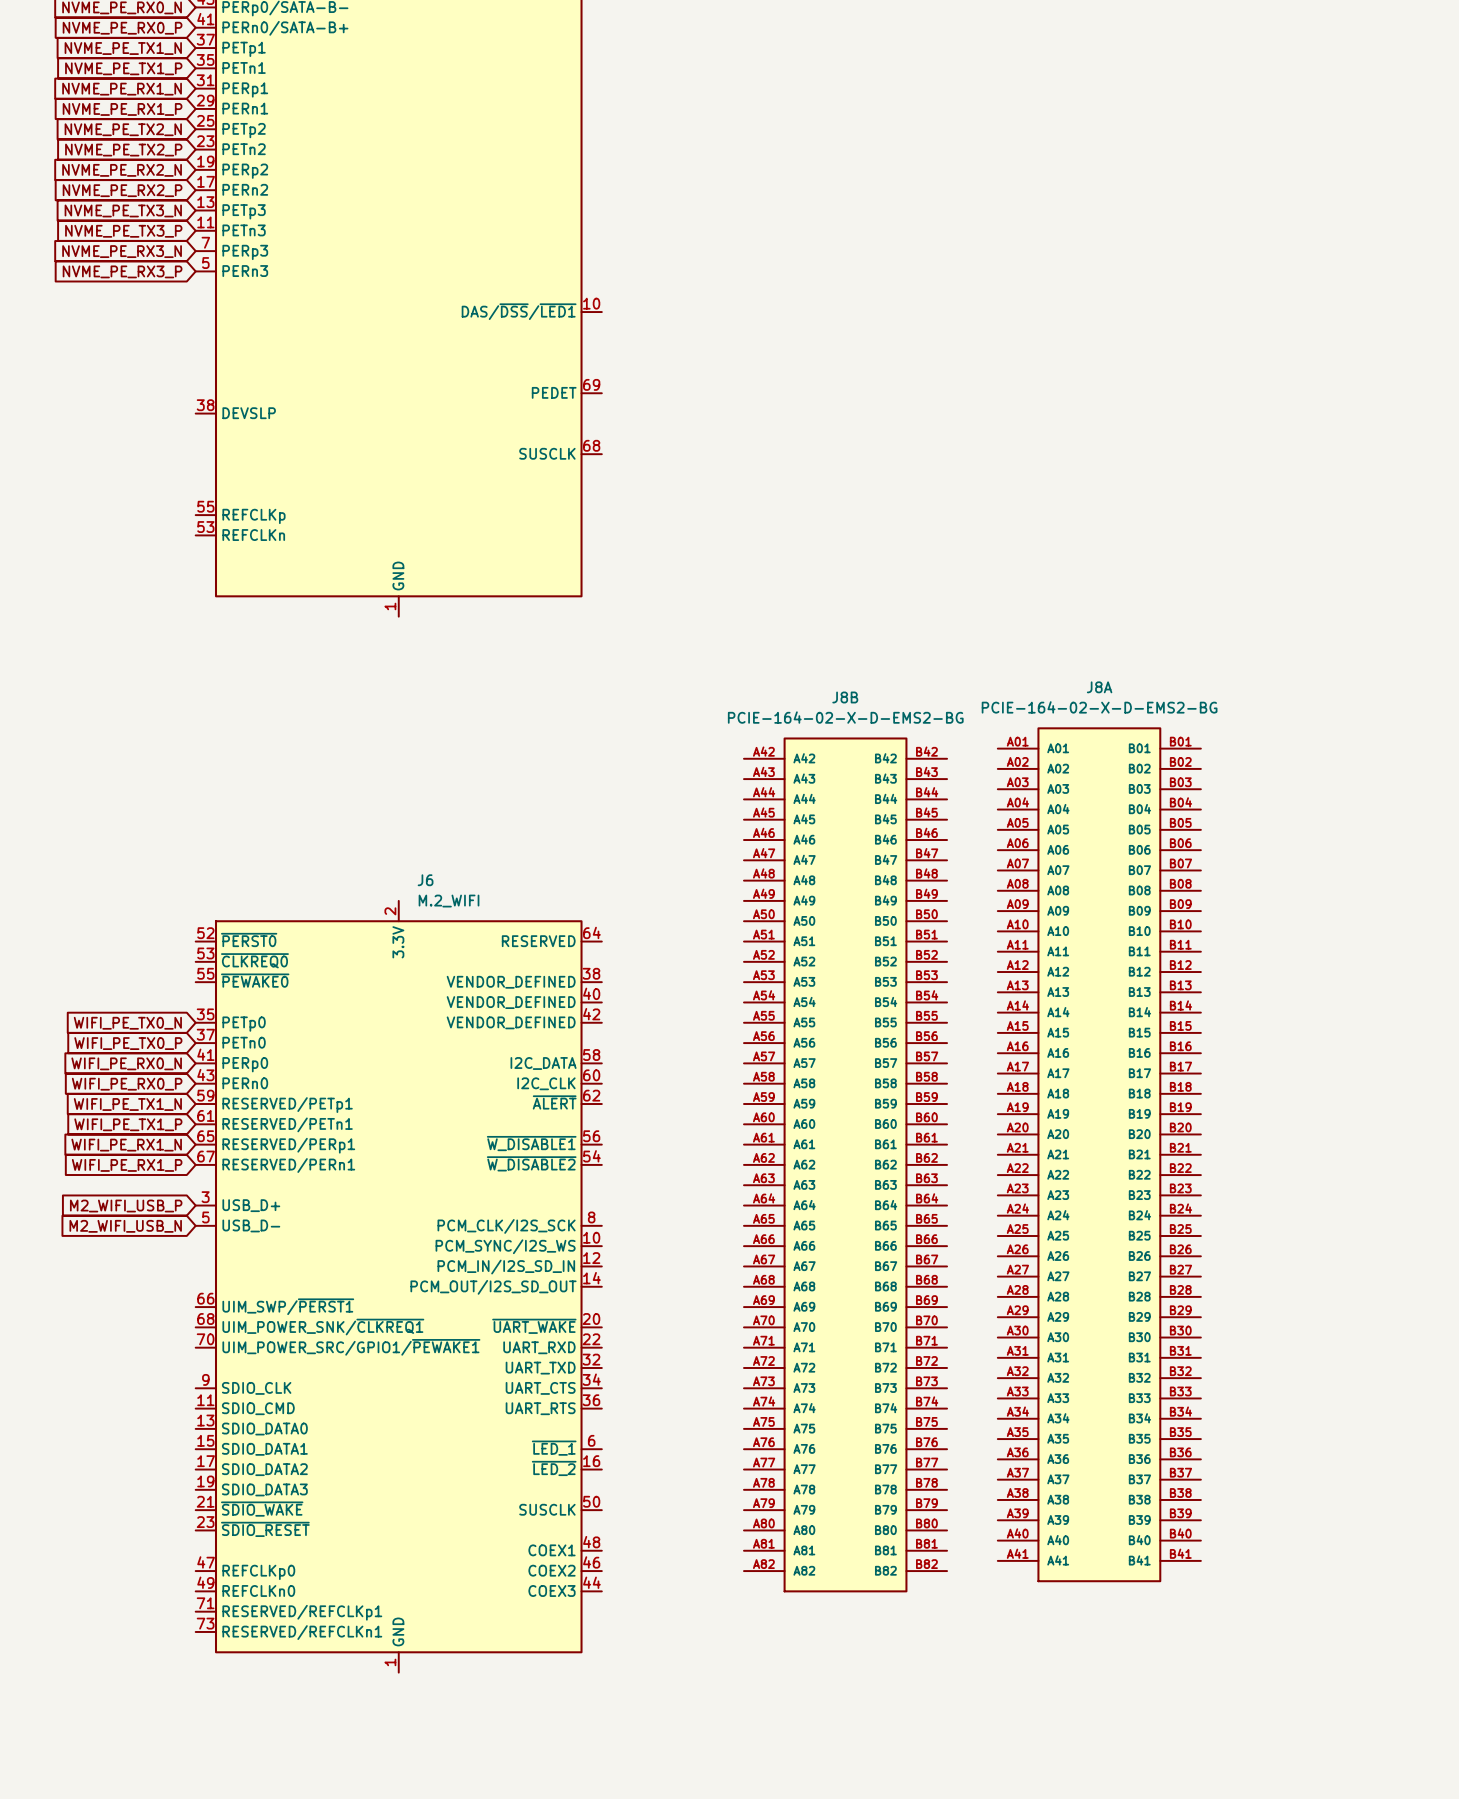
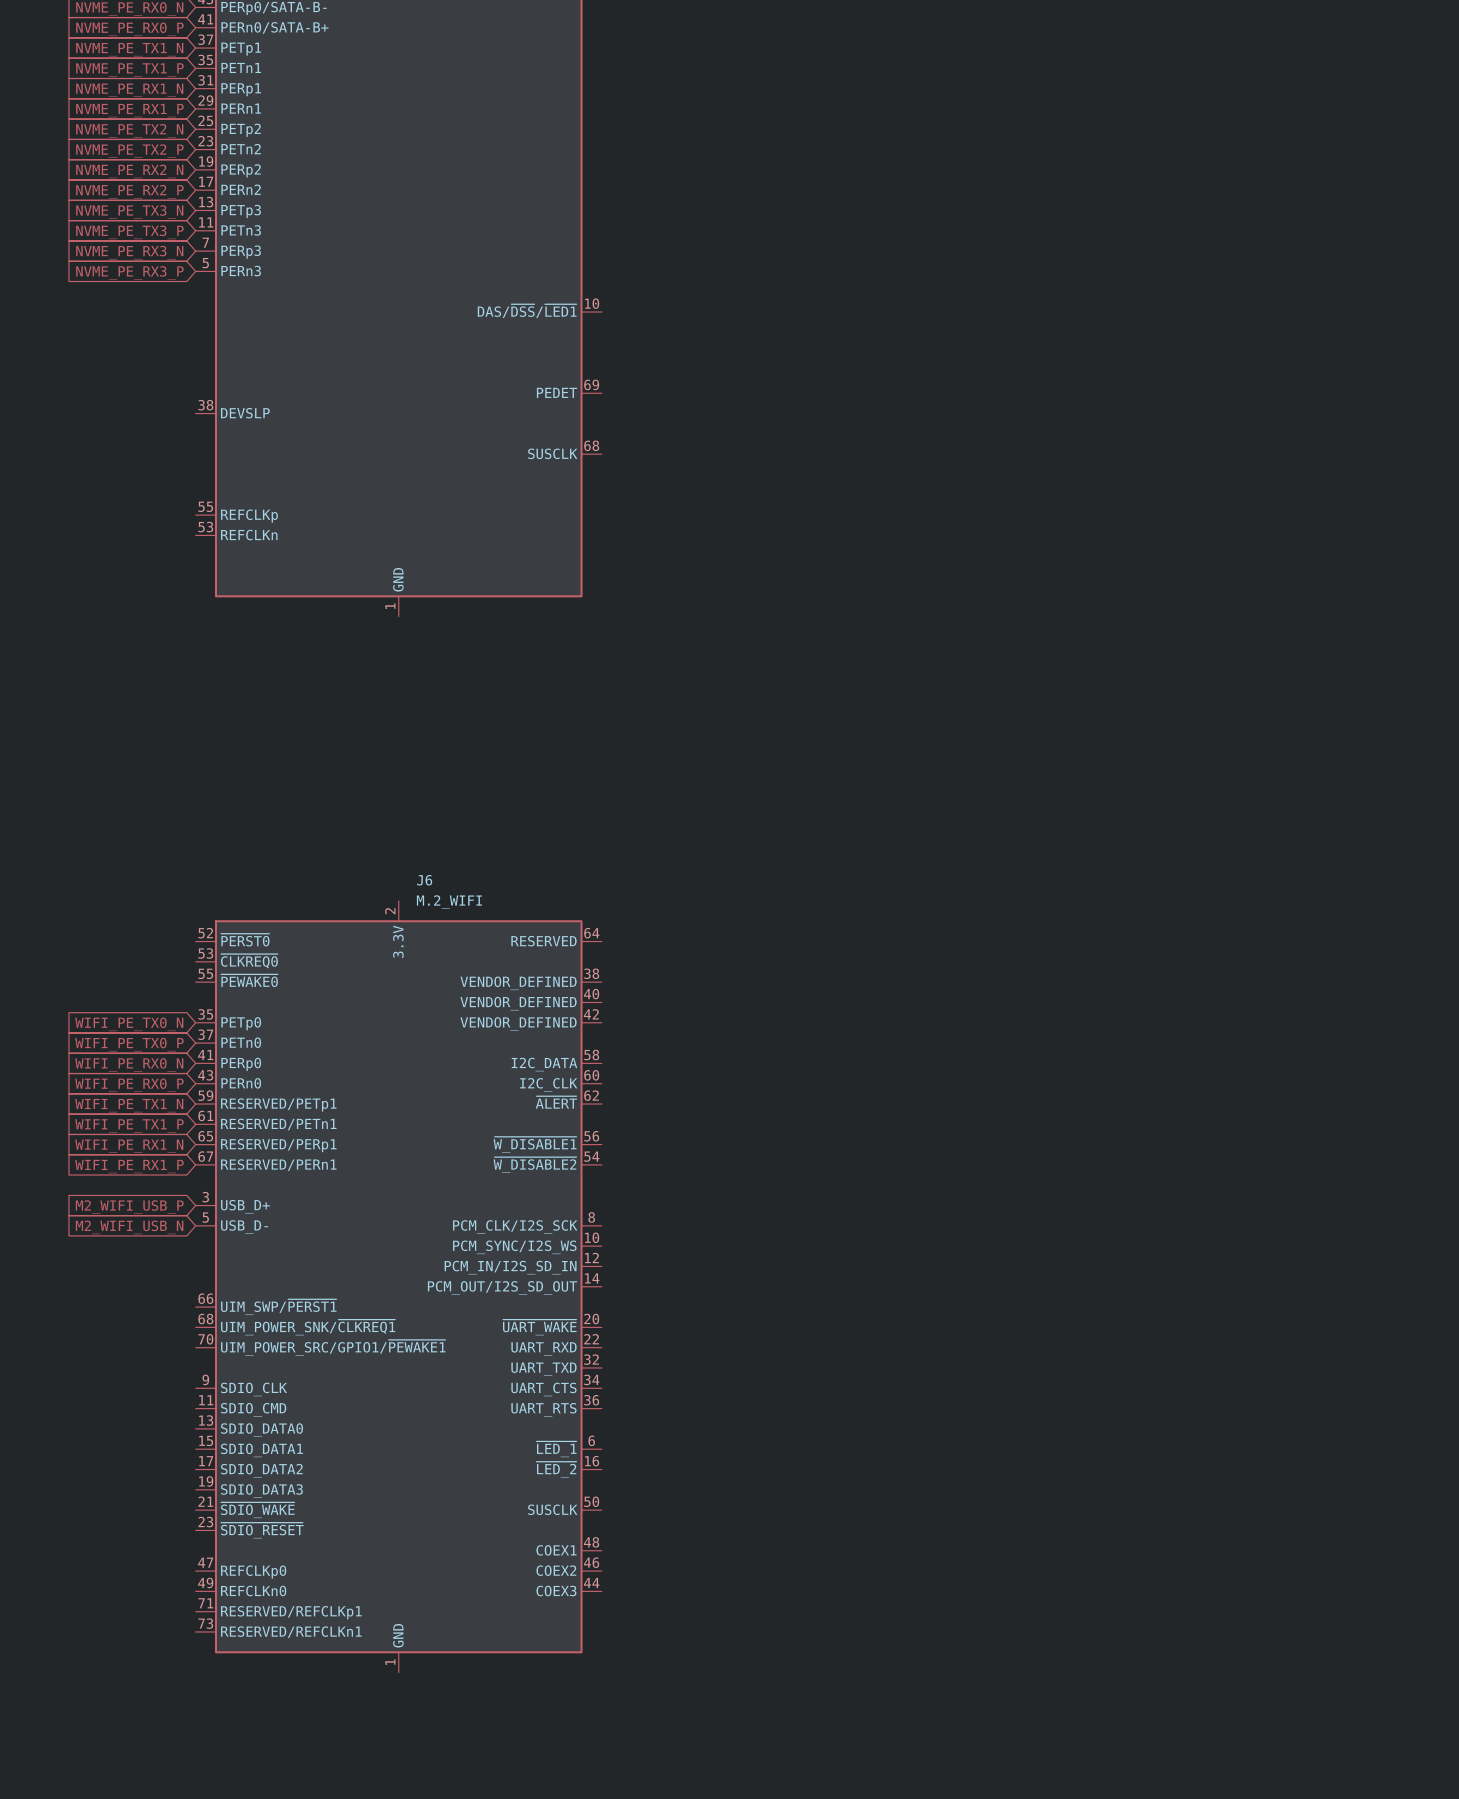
J8A: PCIE-164-02-X-D-EMS2-BG (1099, 1154) -> none
J8B: PCIE-164-02-X-D-EMS2-BG (845, 1164) -> none

